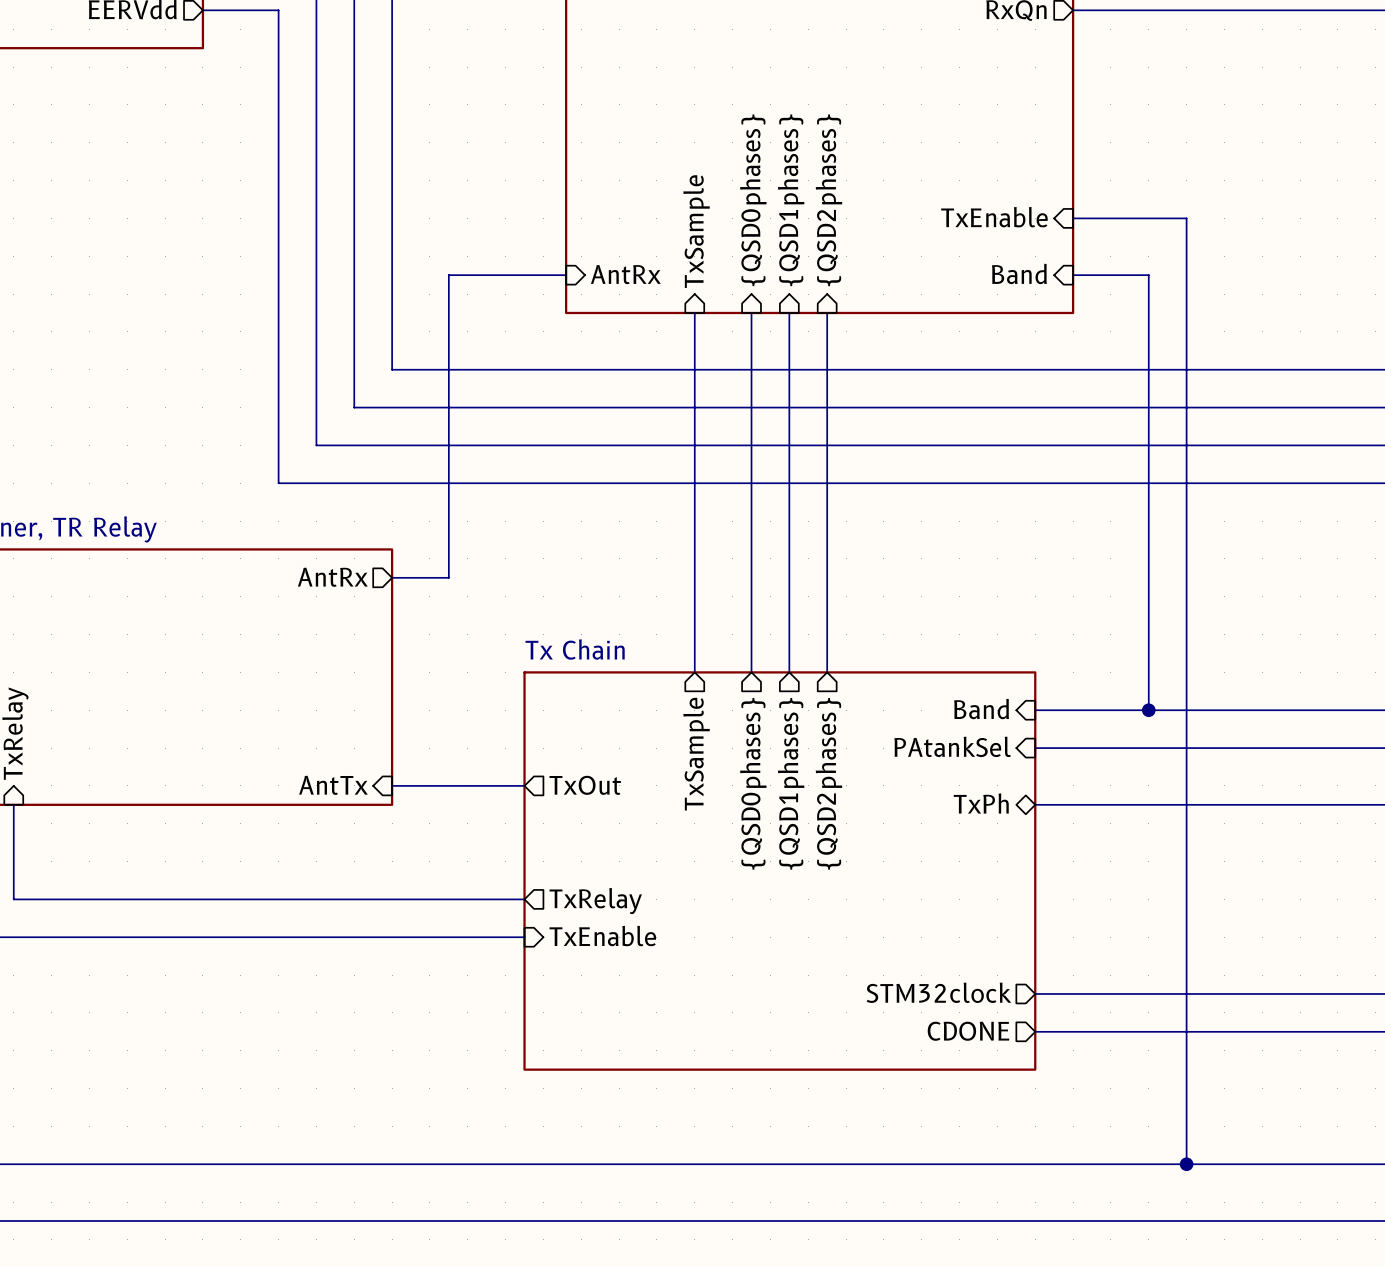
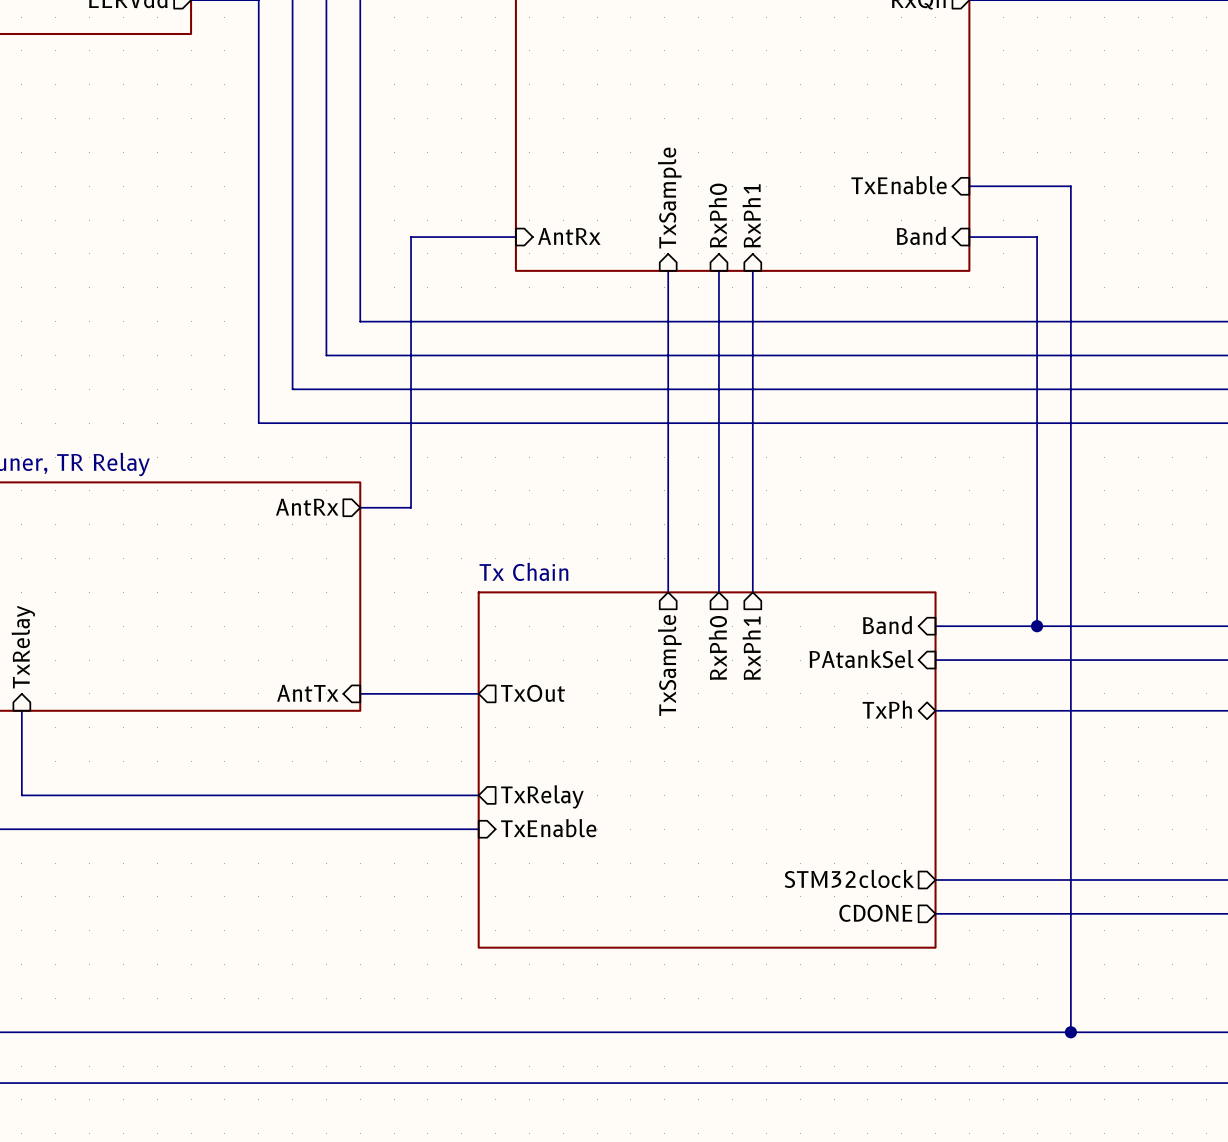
sheet pin: {QSD0phases} (753, 200) -> none
sheet pin: {QSD1phases} (791, 200) -> RxPh0 (717, 215)
sheet pin: {QSD2phases} (828, 200) -> RxPh1 (751, 215)
sheet pin position: TxSample (696, 231) -> TxSample (669, 198)
wire: (694, 312) (694, 672) -> (668, 270) (668, 592)
bus: (751, 312) (751, 672) -> none
bus: (789, 312) (789, 672) -> none
wire: none -> (718, 270) (718, 592)
bus: (827, 312) (827, 672) -> none
wire: none -> (752, 270) (752, 592)
sheet pin position: TxSample (696, 754) -> TxSample (669, 665)
sheet pin: {QSD0phases} (753, 783) -> none
sheet pin: {QSD1phases} (791, 783) -> RxPh0 (717, 647)
sheet pin: {QSD2phases} (828, 783) -> RxPh1 (751, 648)

